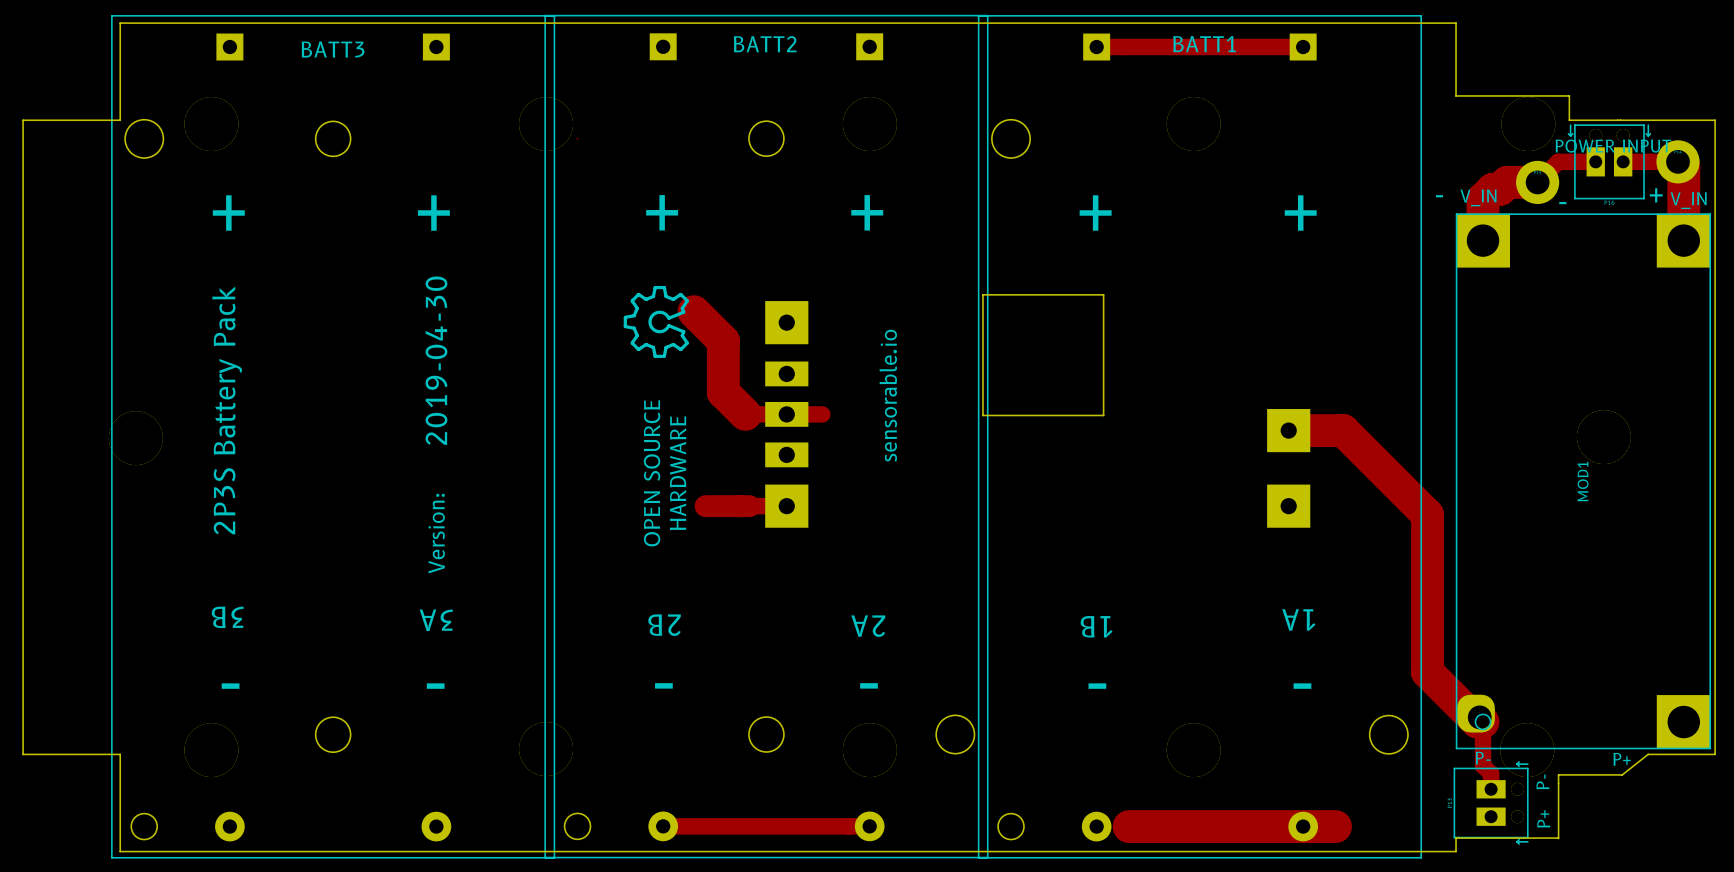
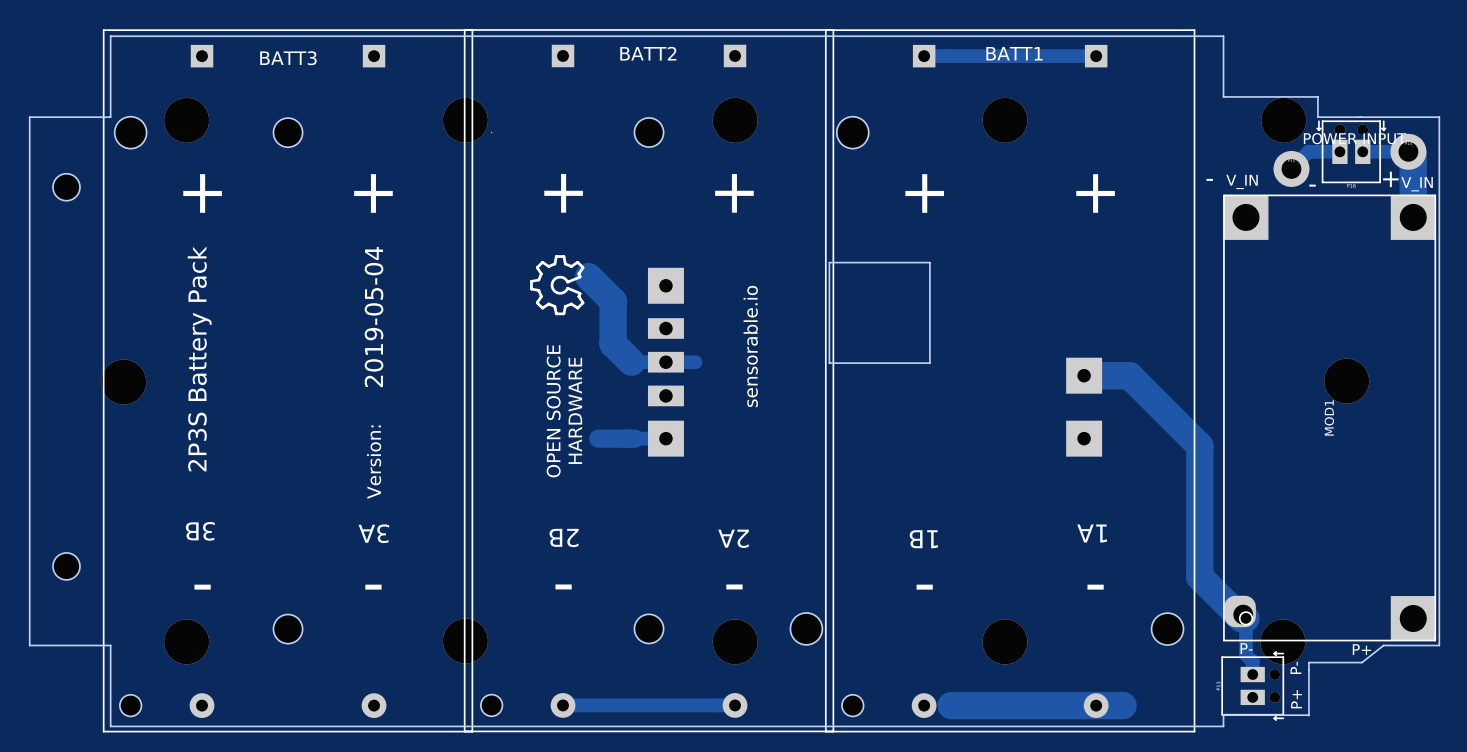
track: (1537, 182) (1507, 182) (1500, 189) (1492, 189) (1483, 199) (1483, 240) -> none
part: none -> (66, 187)
text: 2019-04-30 (436, 360) -> 2019-05-04 (374, 317)
part: none -> (66, 566)

